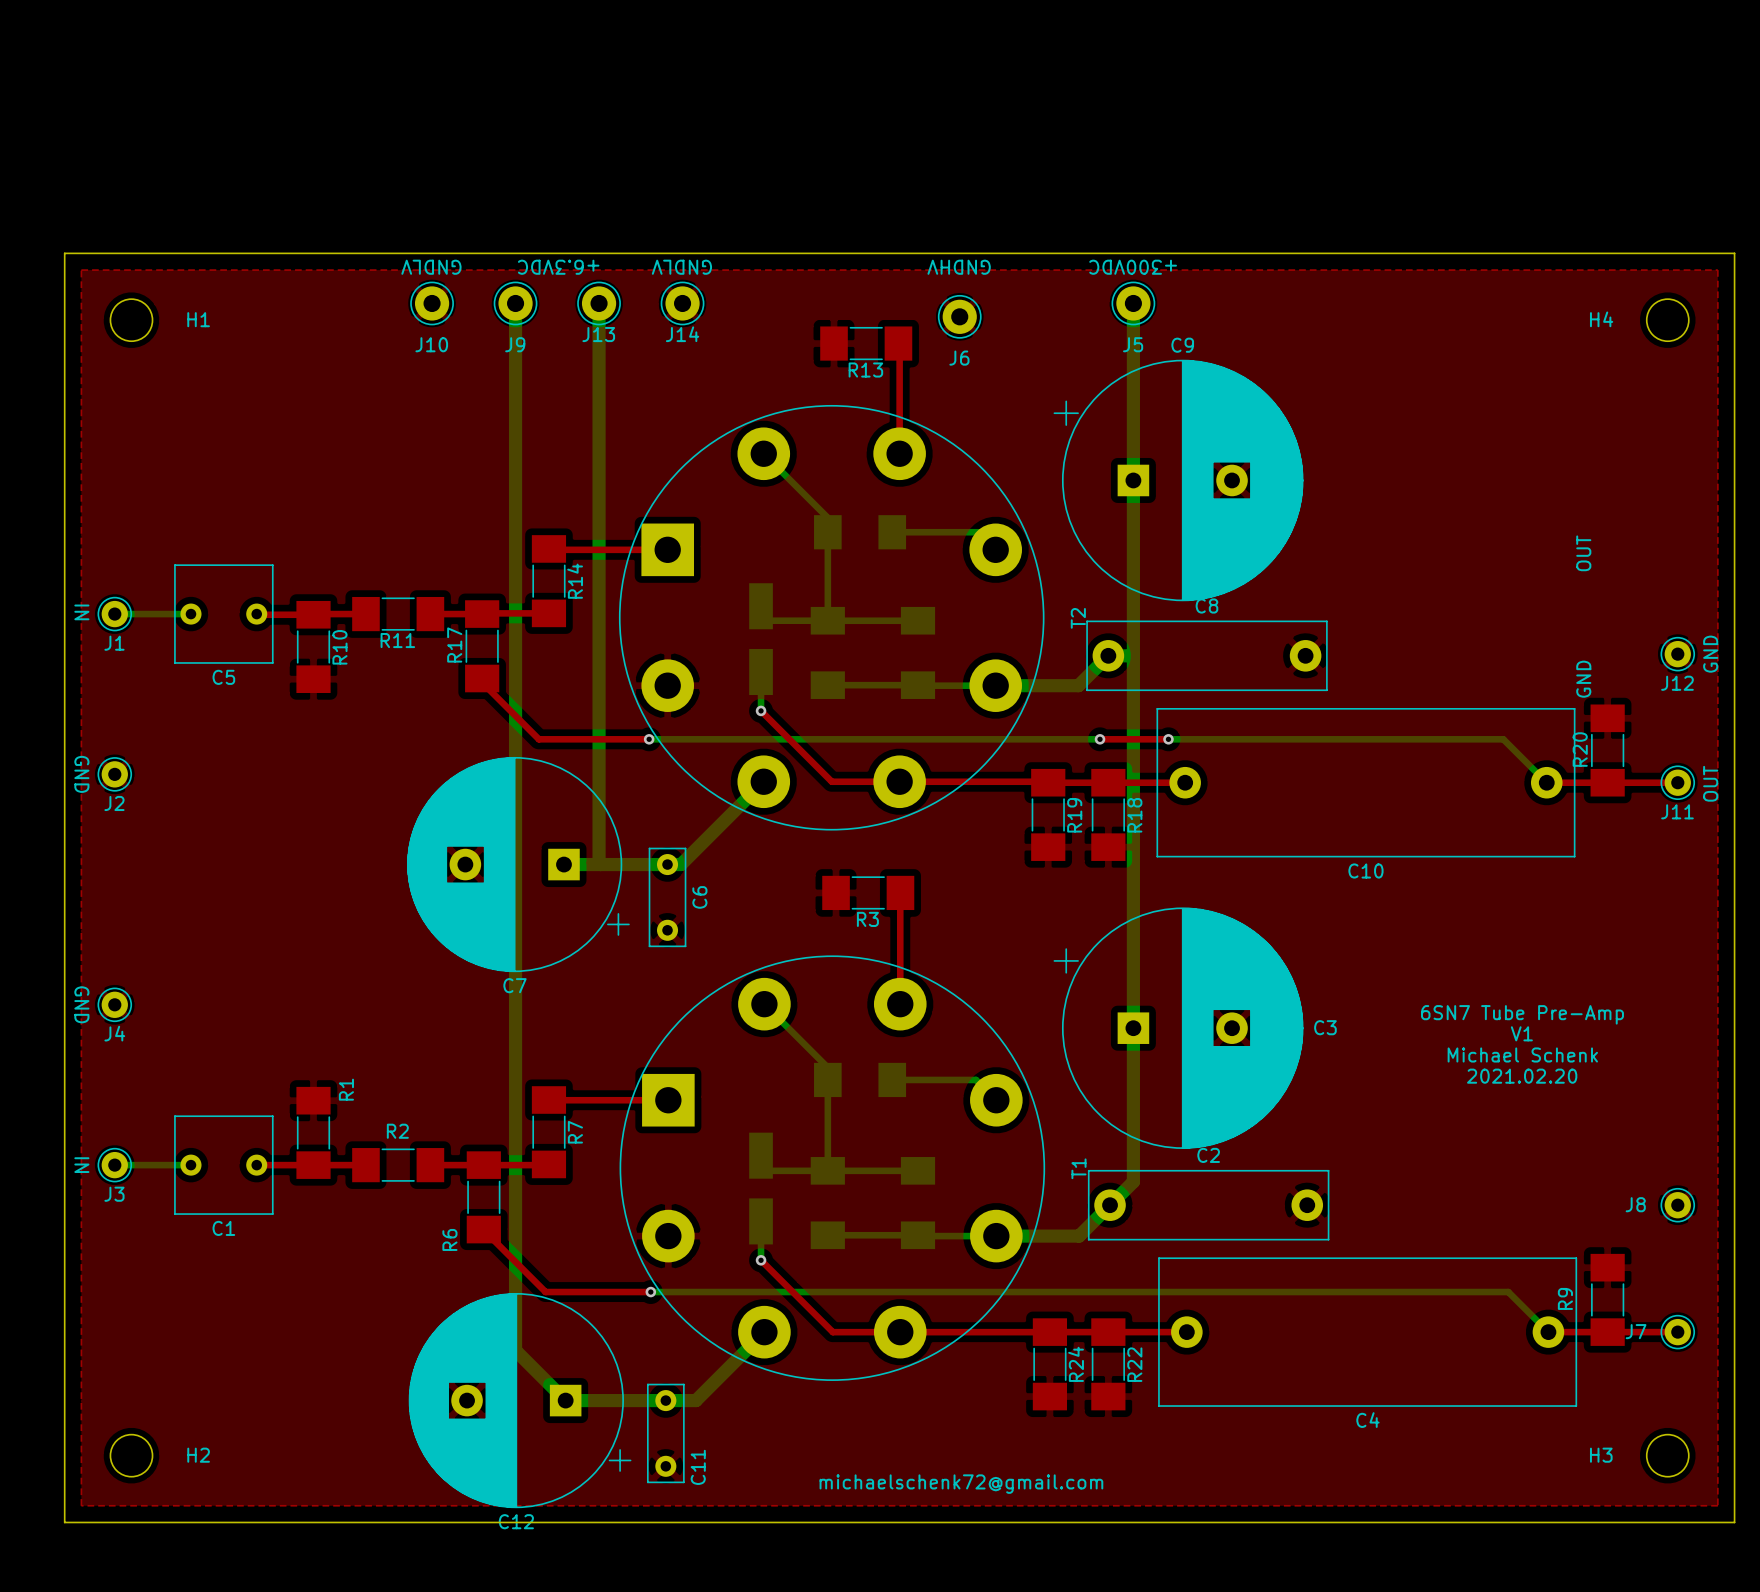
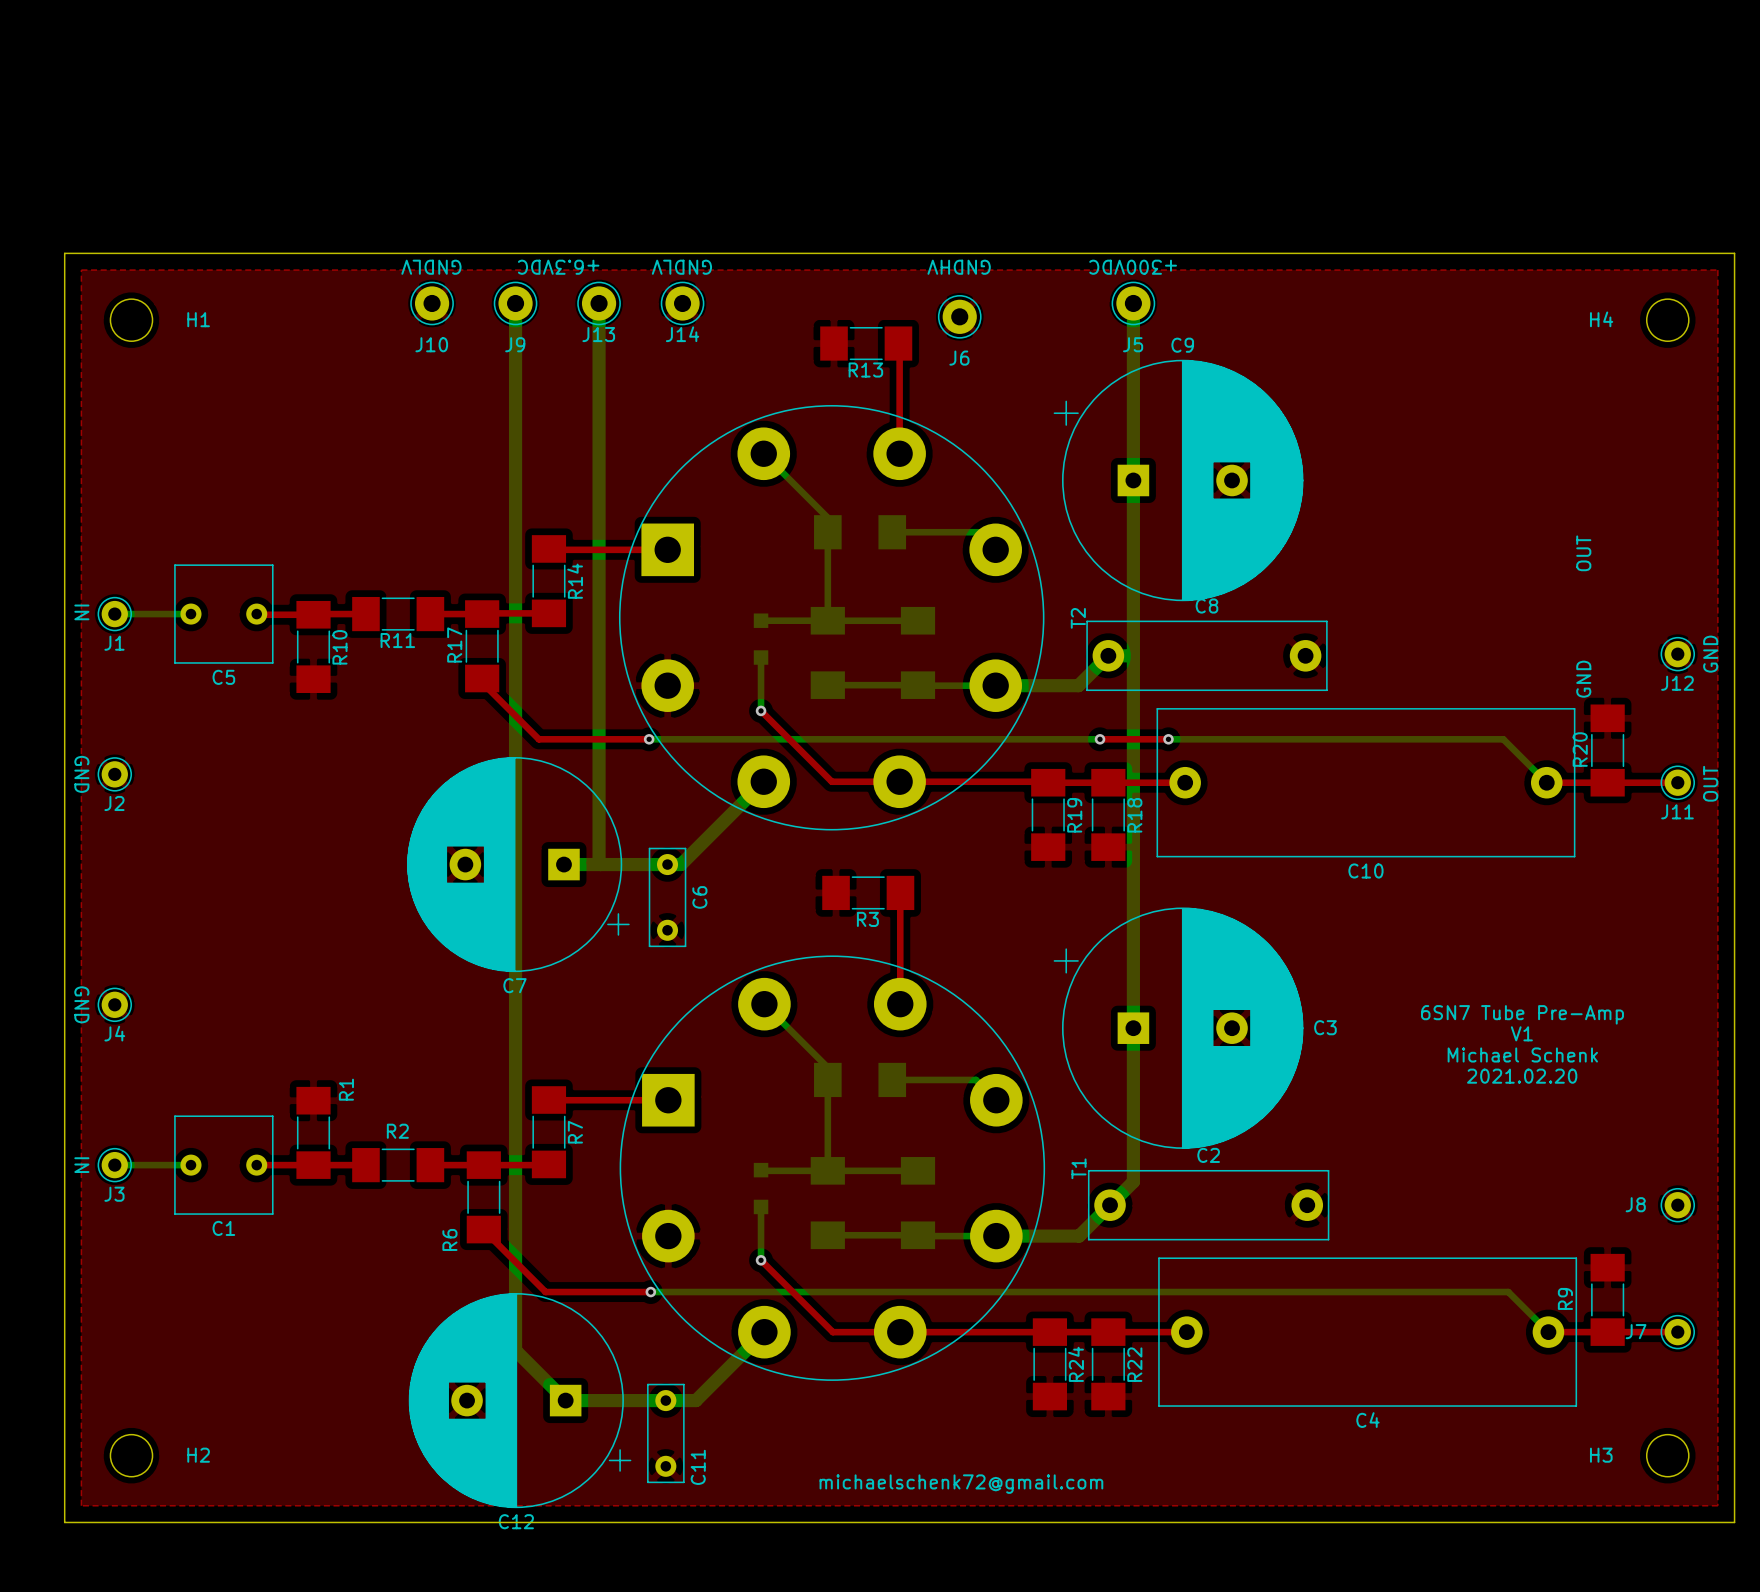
part footprint: [749, 583, 773, 696] -> [753, 613, 769, 665]
part footprint: [749, 1132, 773, 1245] -> [753, 1162, 769, 1215]

